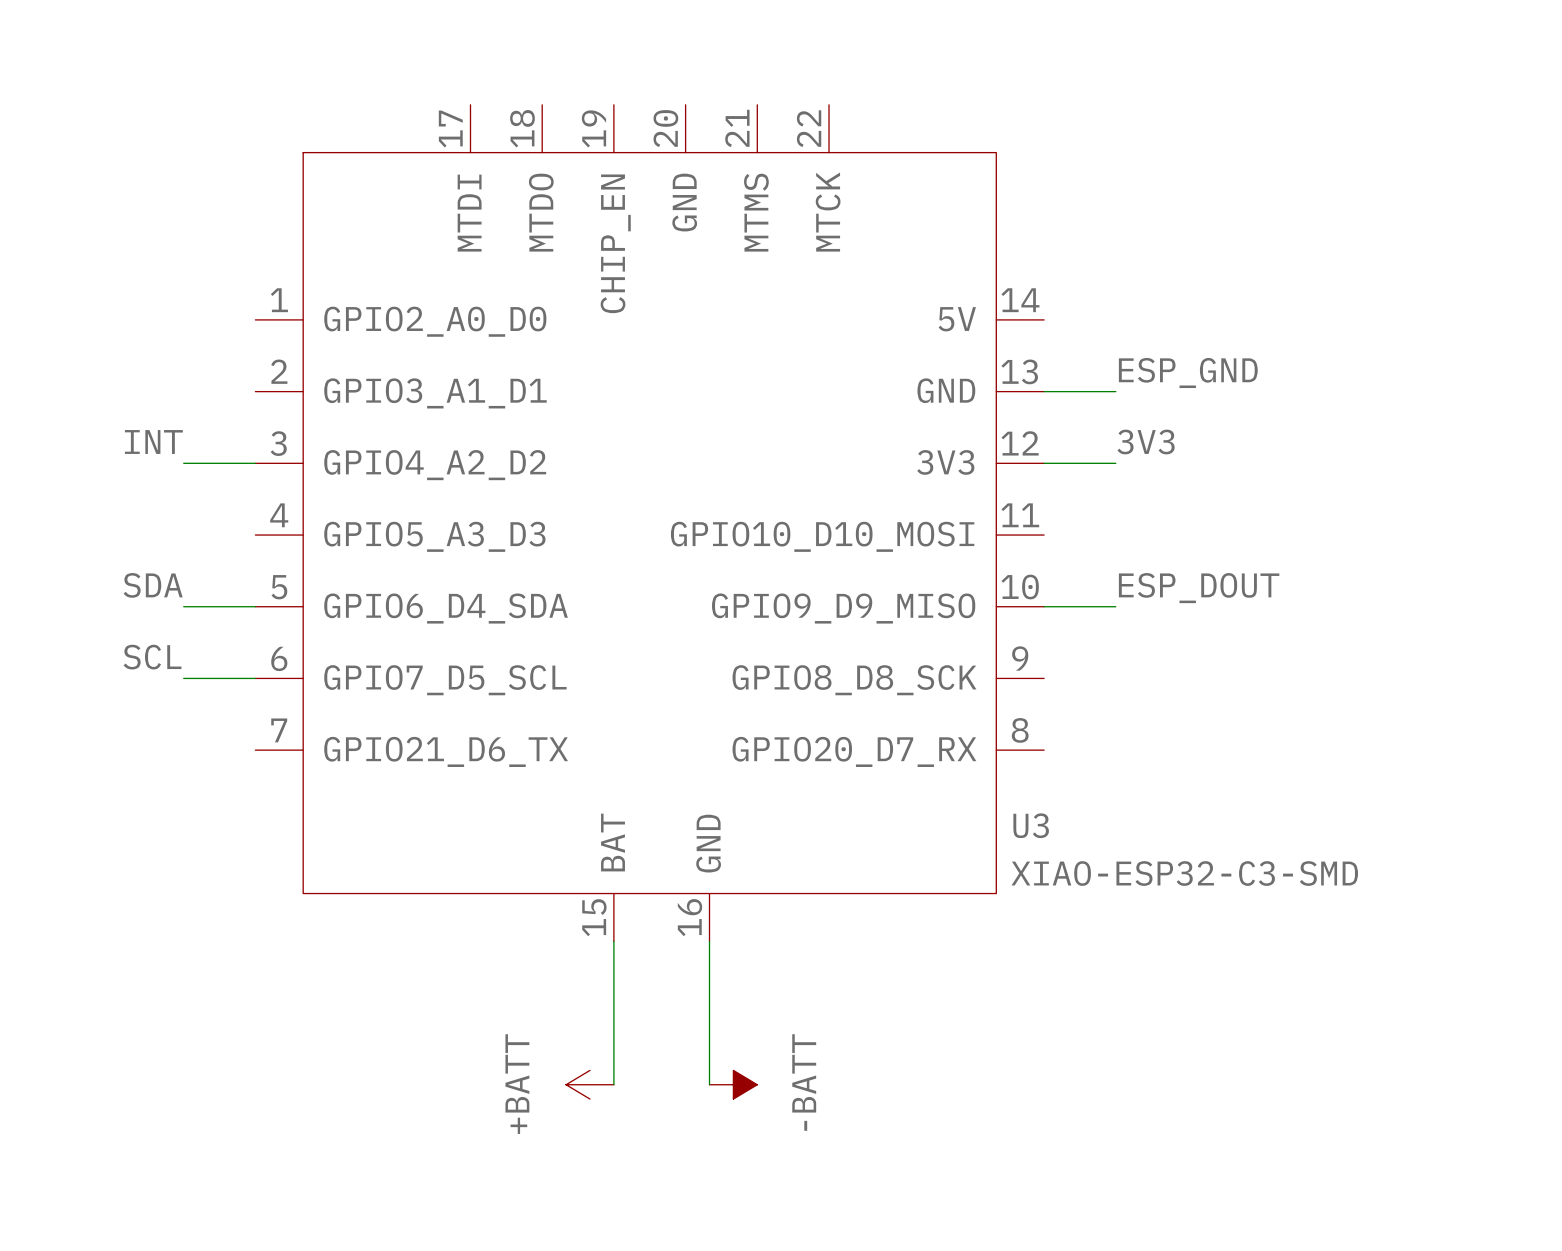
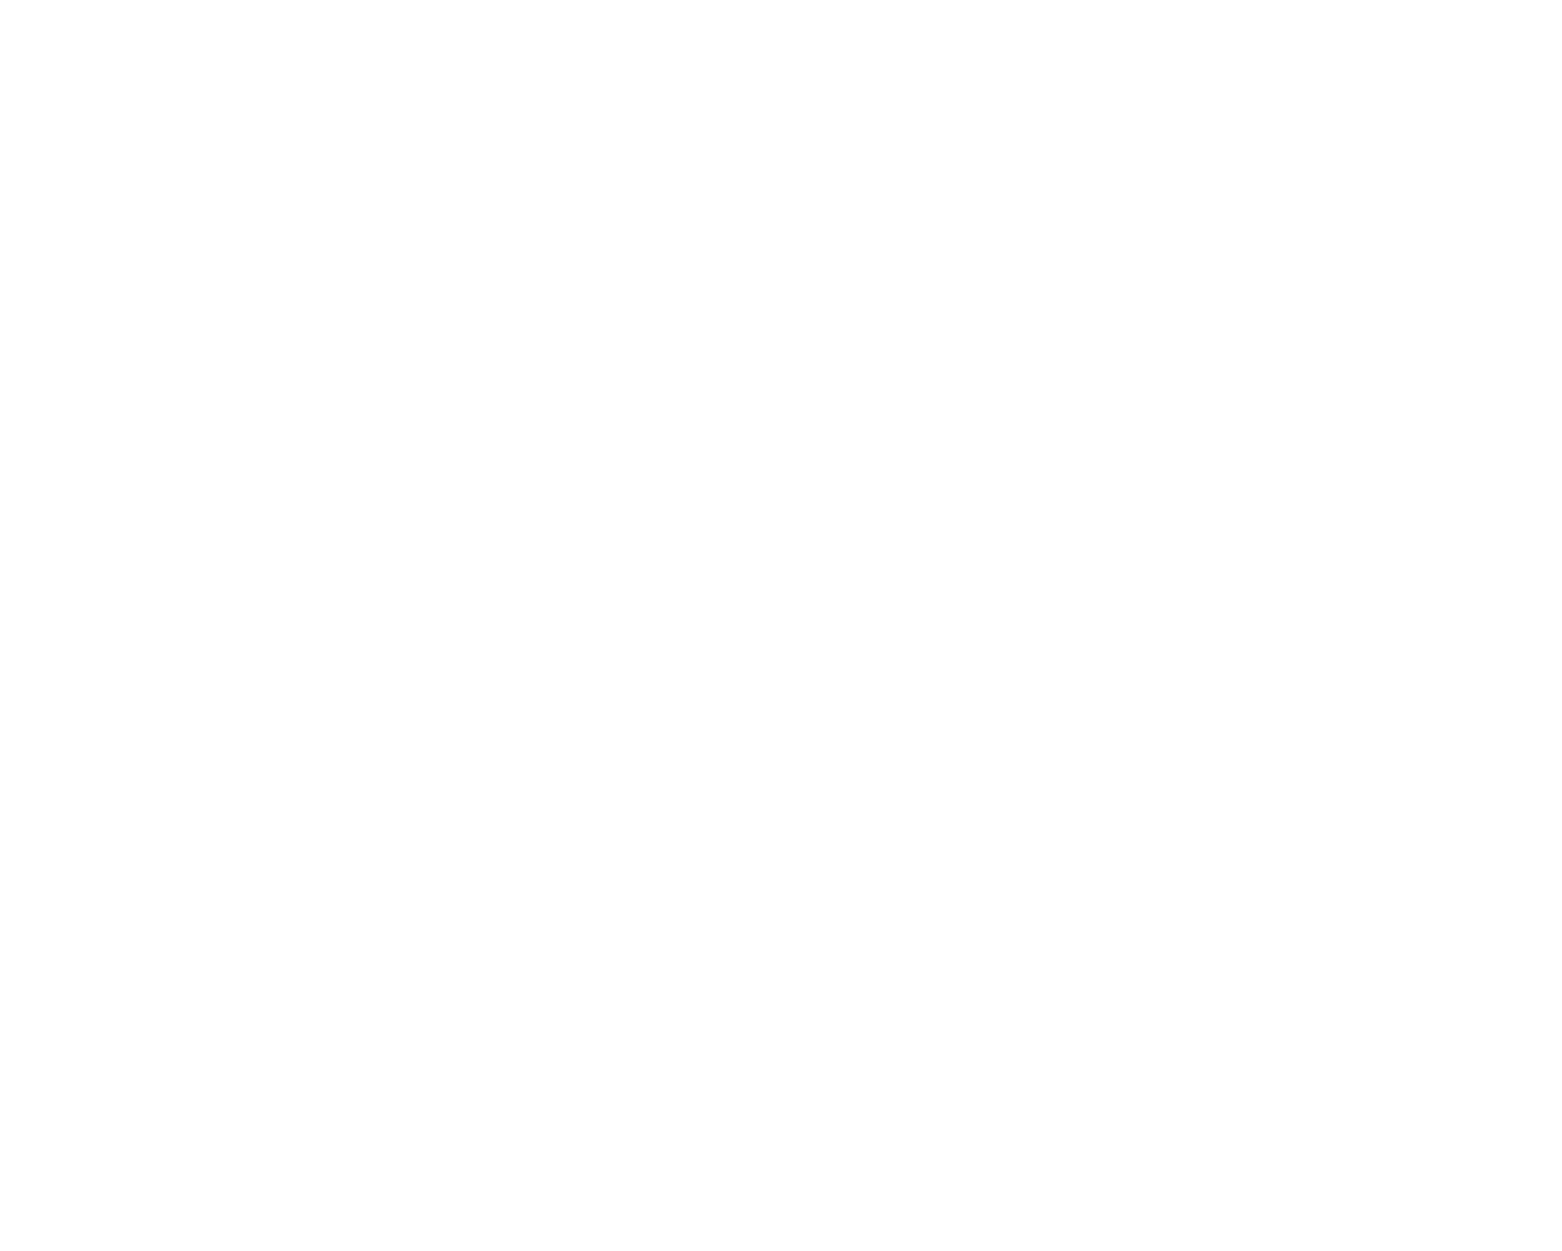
label: ESP_GND (1188, 372) -> none
wire: (1044, 391) (1115, 391) -> none
label: INT (153, 441) -> none
label: 3V3 (1146, 441) -> none
wire: (183, 463) (255, 463) -> none
wire: (1044, 463) (1115, 463) -> none
U3: XIAO-ESP32-C3-SMD (649, 523) -> none
label: SDA (153, 585) -> none
label: ESP_DOUT (1199, 588) -> none
wire: (183, 606) (255, 606) -> none
wire: (1044, 606) (1115, 606) -> none
label: SCL (152, 657) -> none
wire: (183, 678) (255, 678) -> none
wire: (613, 941) (613, 1084) -> none
wire: (709, 941) (709, 1084) -> none
power symbol: +BATT (590, 1084) -> none
power symbol: -BATT (733, 1084) -> none

